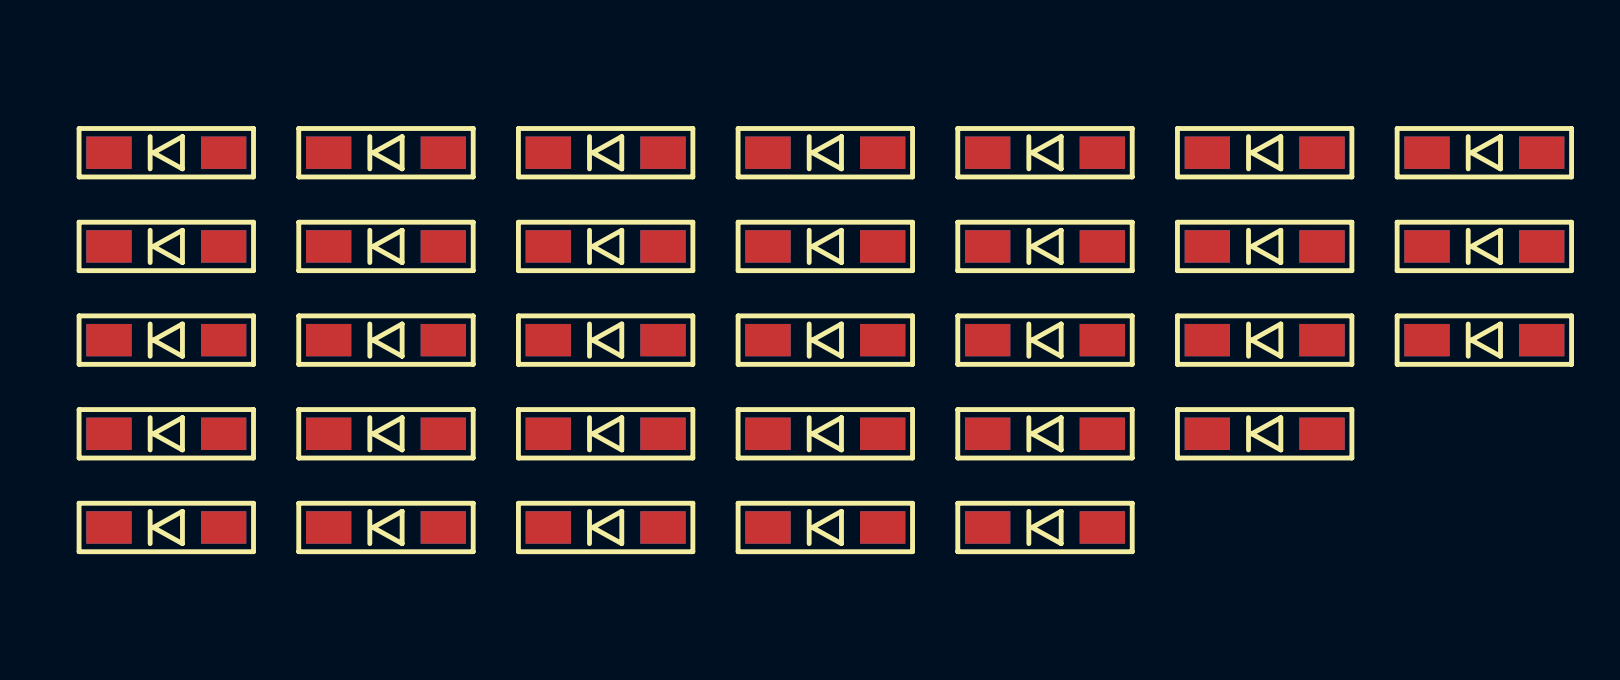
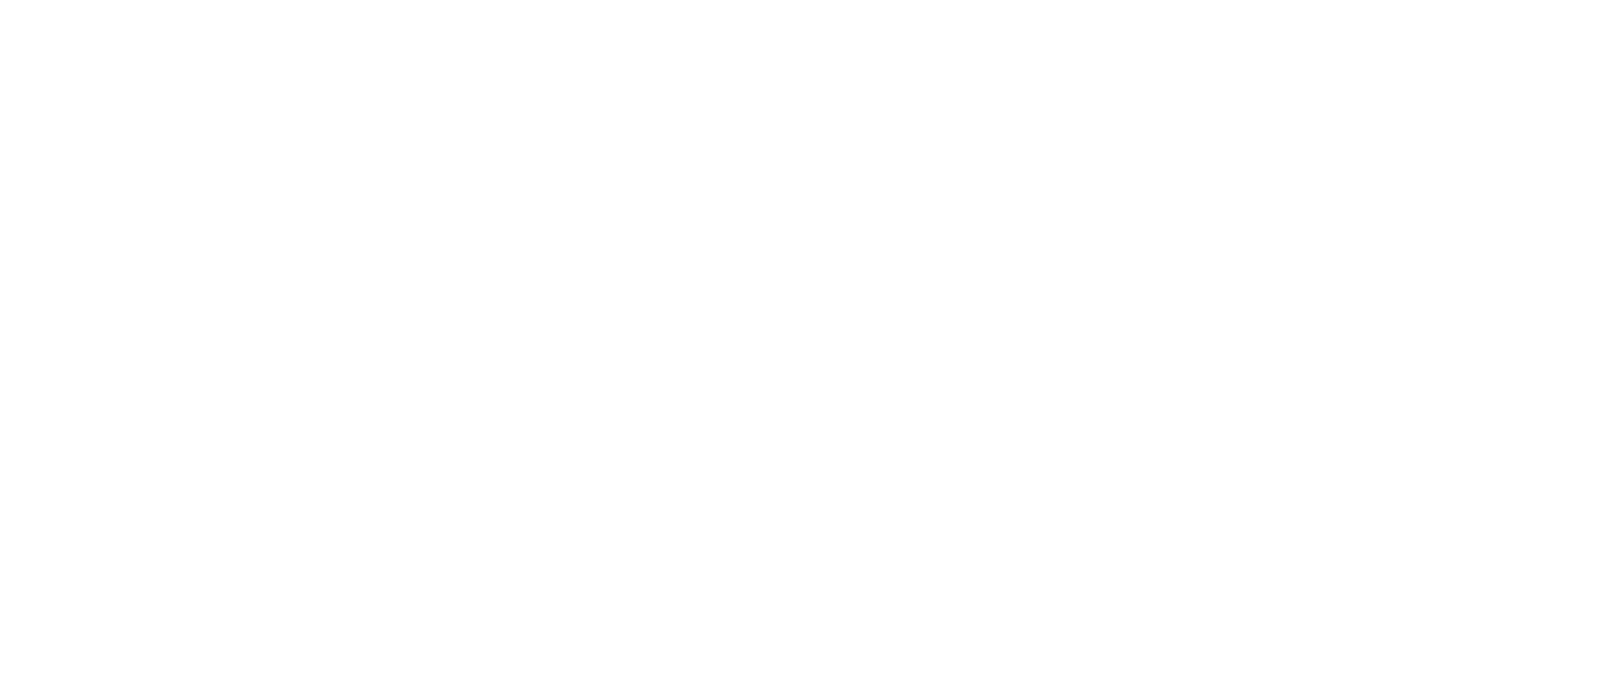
part: (166, 152) -> none
part: (385, 152) -> none
part: (605, 152) -> none
part: (825, 152) -> none
part: (1045, 152) -> none
part: (1264, 152) -> none
part: (1484, 152) -> none
part: (166, 246) -> none
part: (385, 246) -> none
part: (605, 246) -> none
part: (825, 246) -> none
part: (1045, 246) -> none
part: (1264, 246) -> none
part: (1484, 246) -> none
part: (166, 340) -> none
part: (385, 340) -> none
part: (605, 340) -> none
part: (825, 340) -> none
part: (1045, 340) -> none
part: (1264, 340) -> none
part: (1484, 340) -> none
part: (166, 433) -> none
part: (385, 433) -> none
part: (605, 433) -> none
part: (825, 433) -> none
part: (1045, 433) -> none
part: (1264, 433) -> none
part: (166, 527) -> none
part: (385, 527) -> none
part: (605, 527) -> none
part: (825, 527) -> none
part: (1045, 527) -> none

